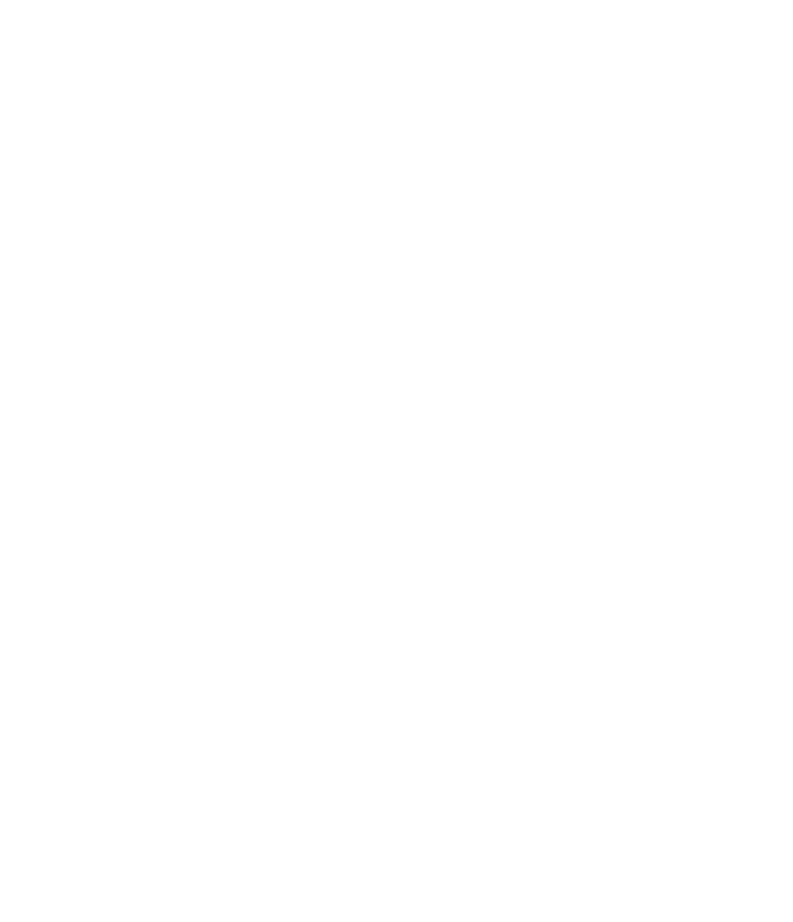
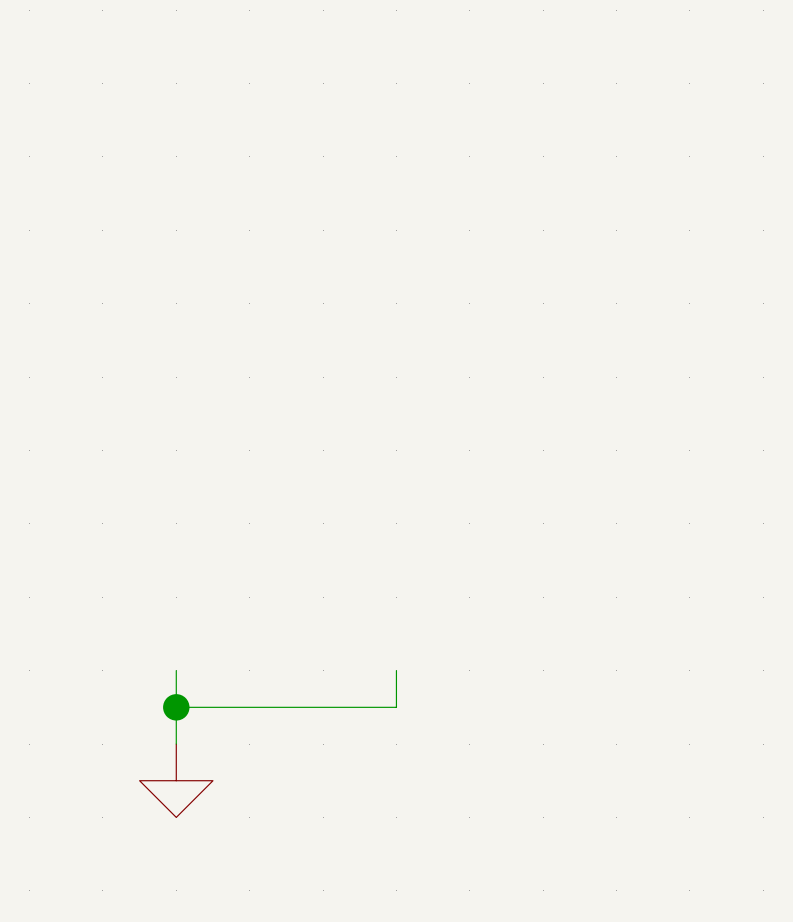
wire: none -> (176, 670) (176, 744)
wire: none -> (396, 670) (396, 707) (176, 707)
junction: none -> (176, 707)
power symbol: none -> (176, 780)

